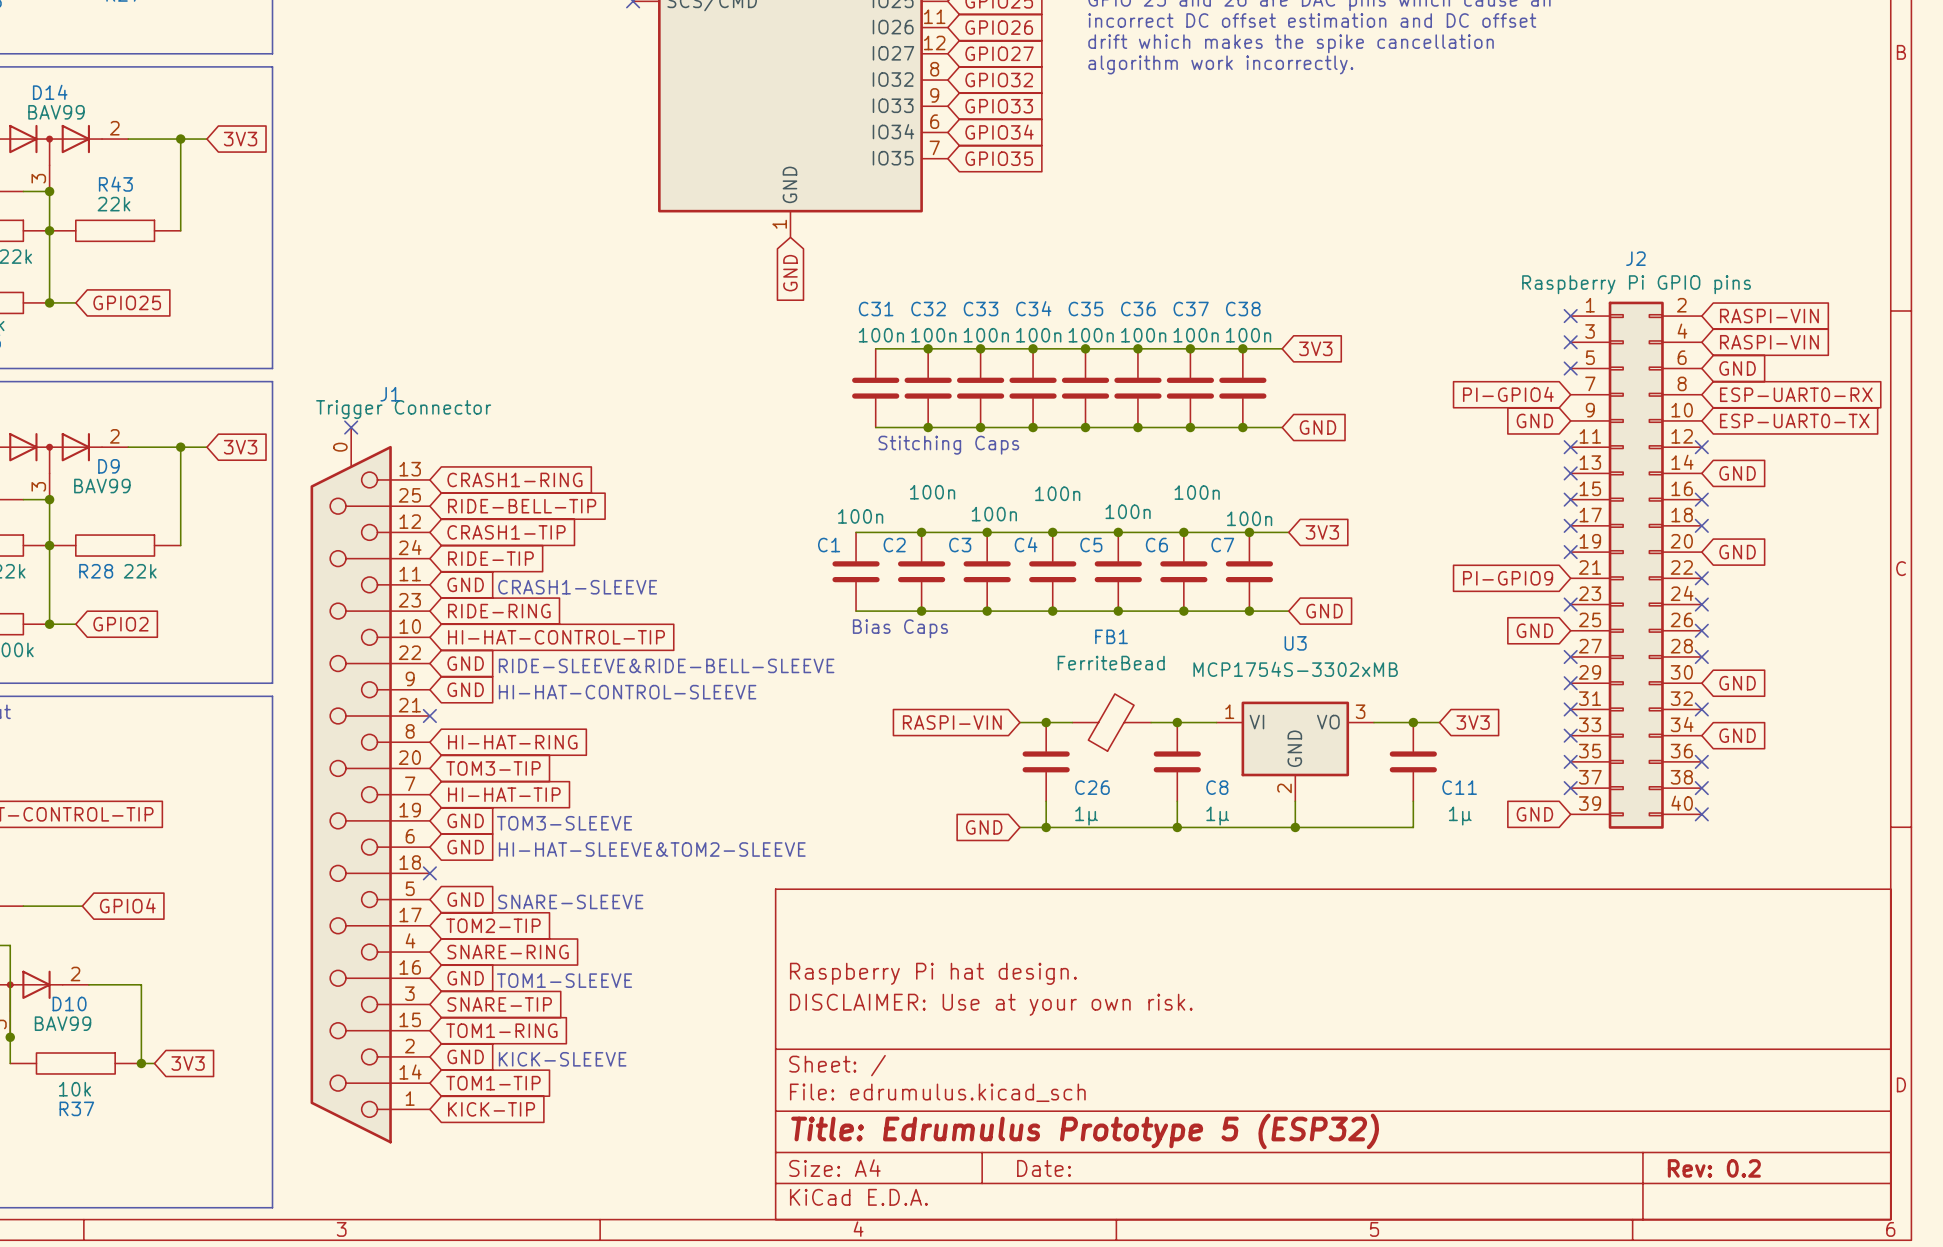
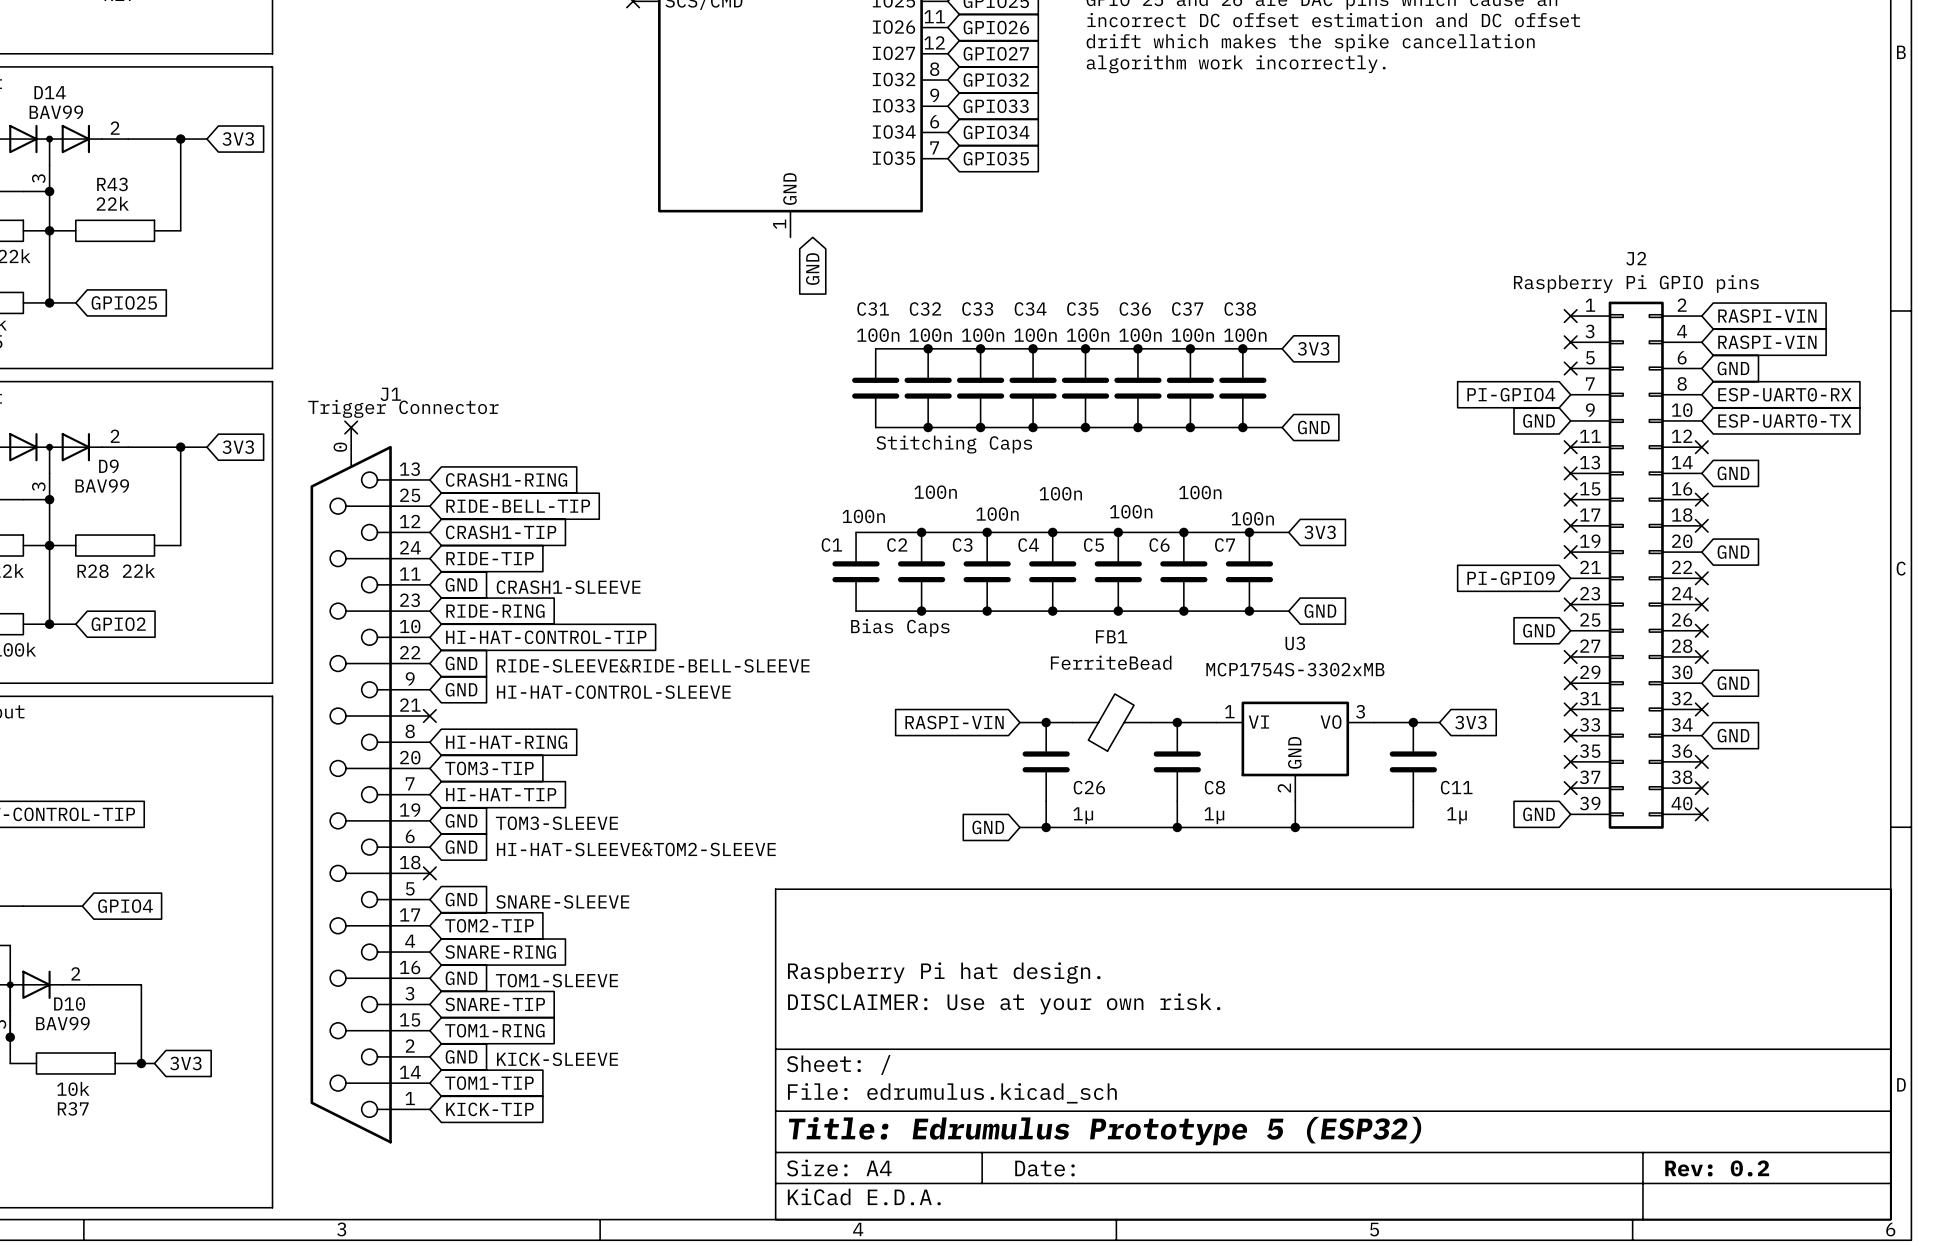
global label position: GND (790, 273) -> GND (812, 269)

